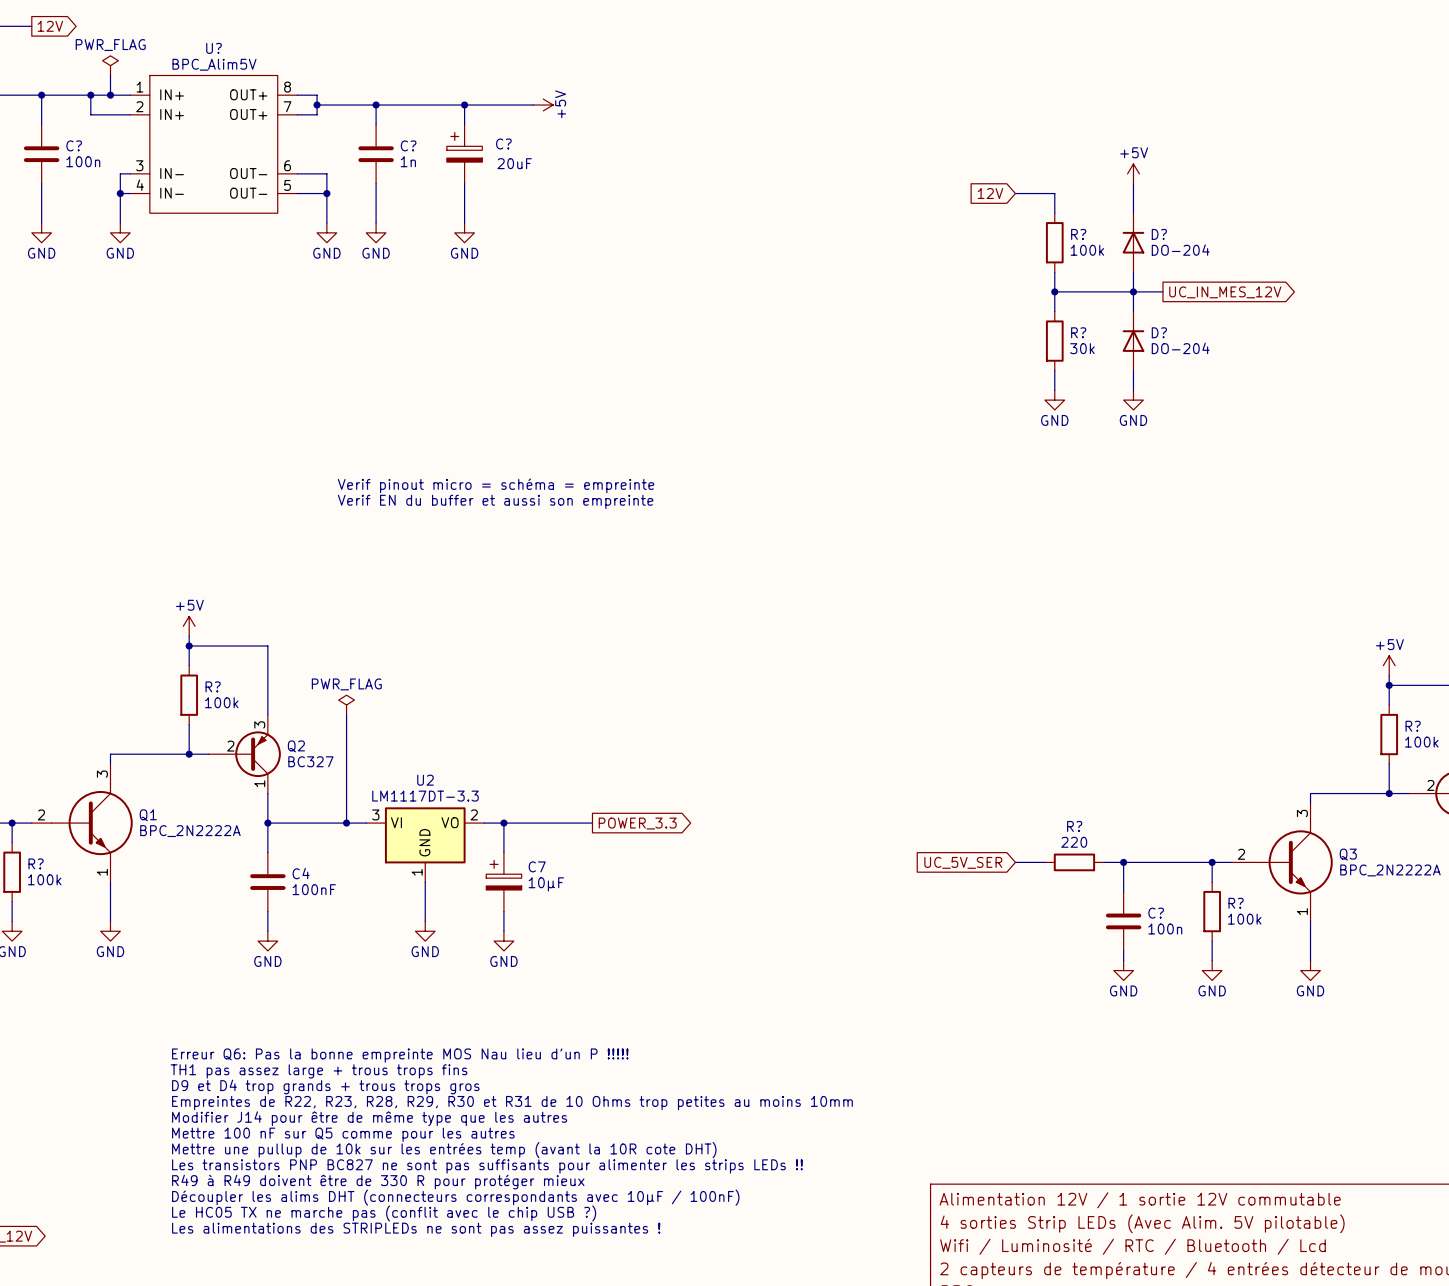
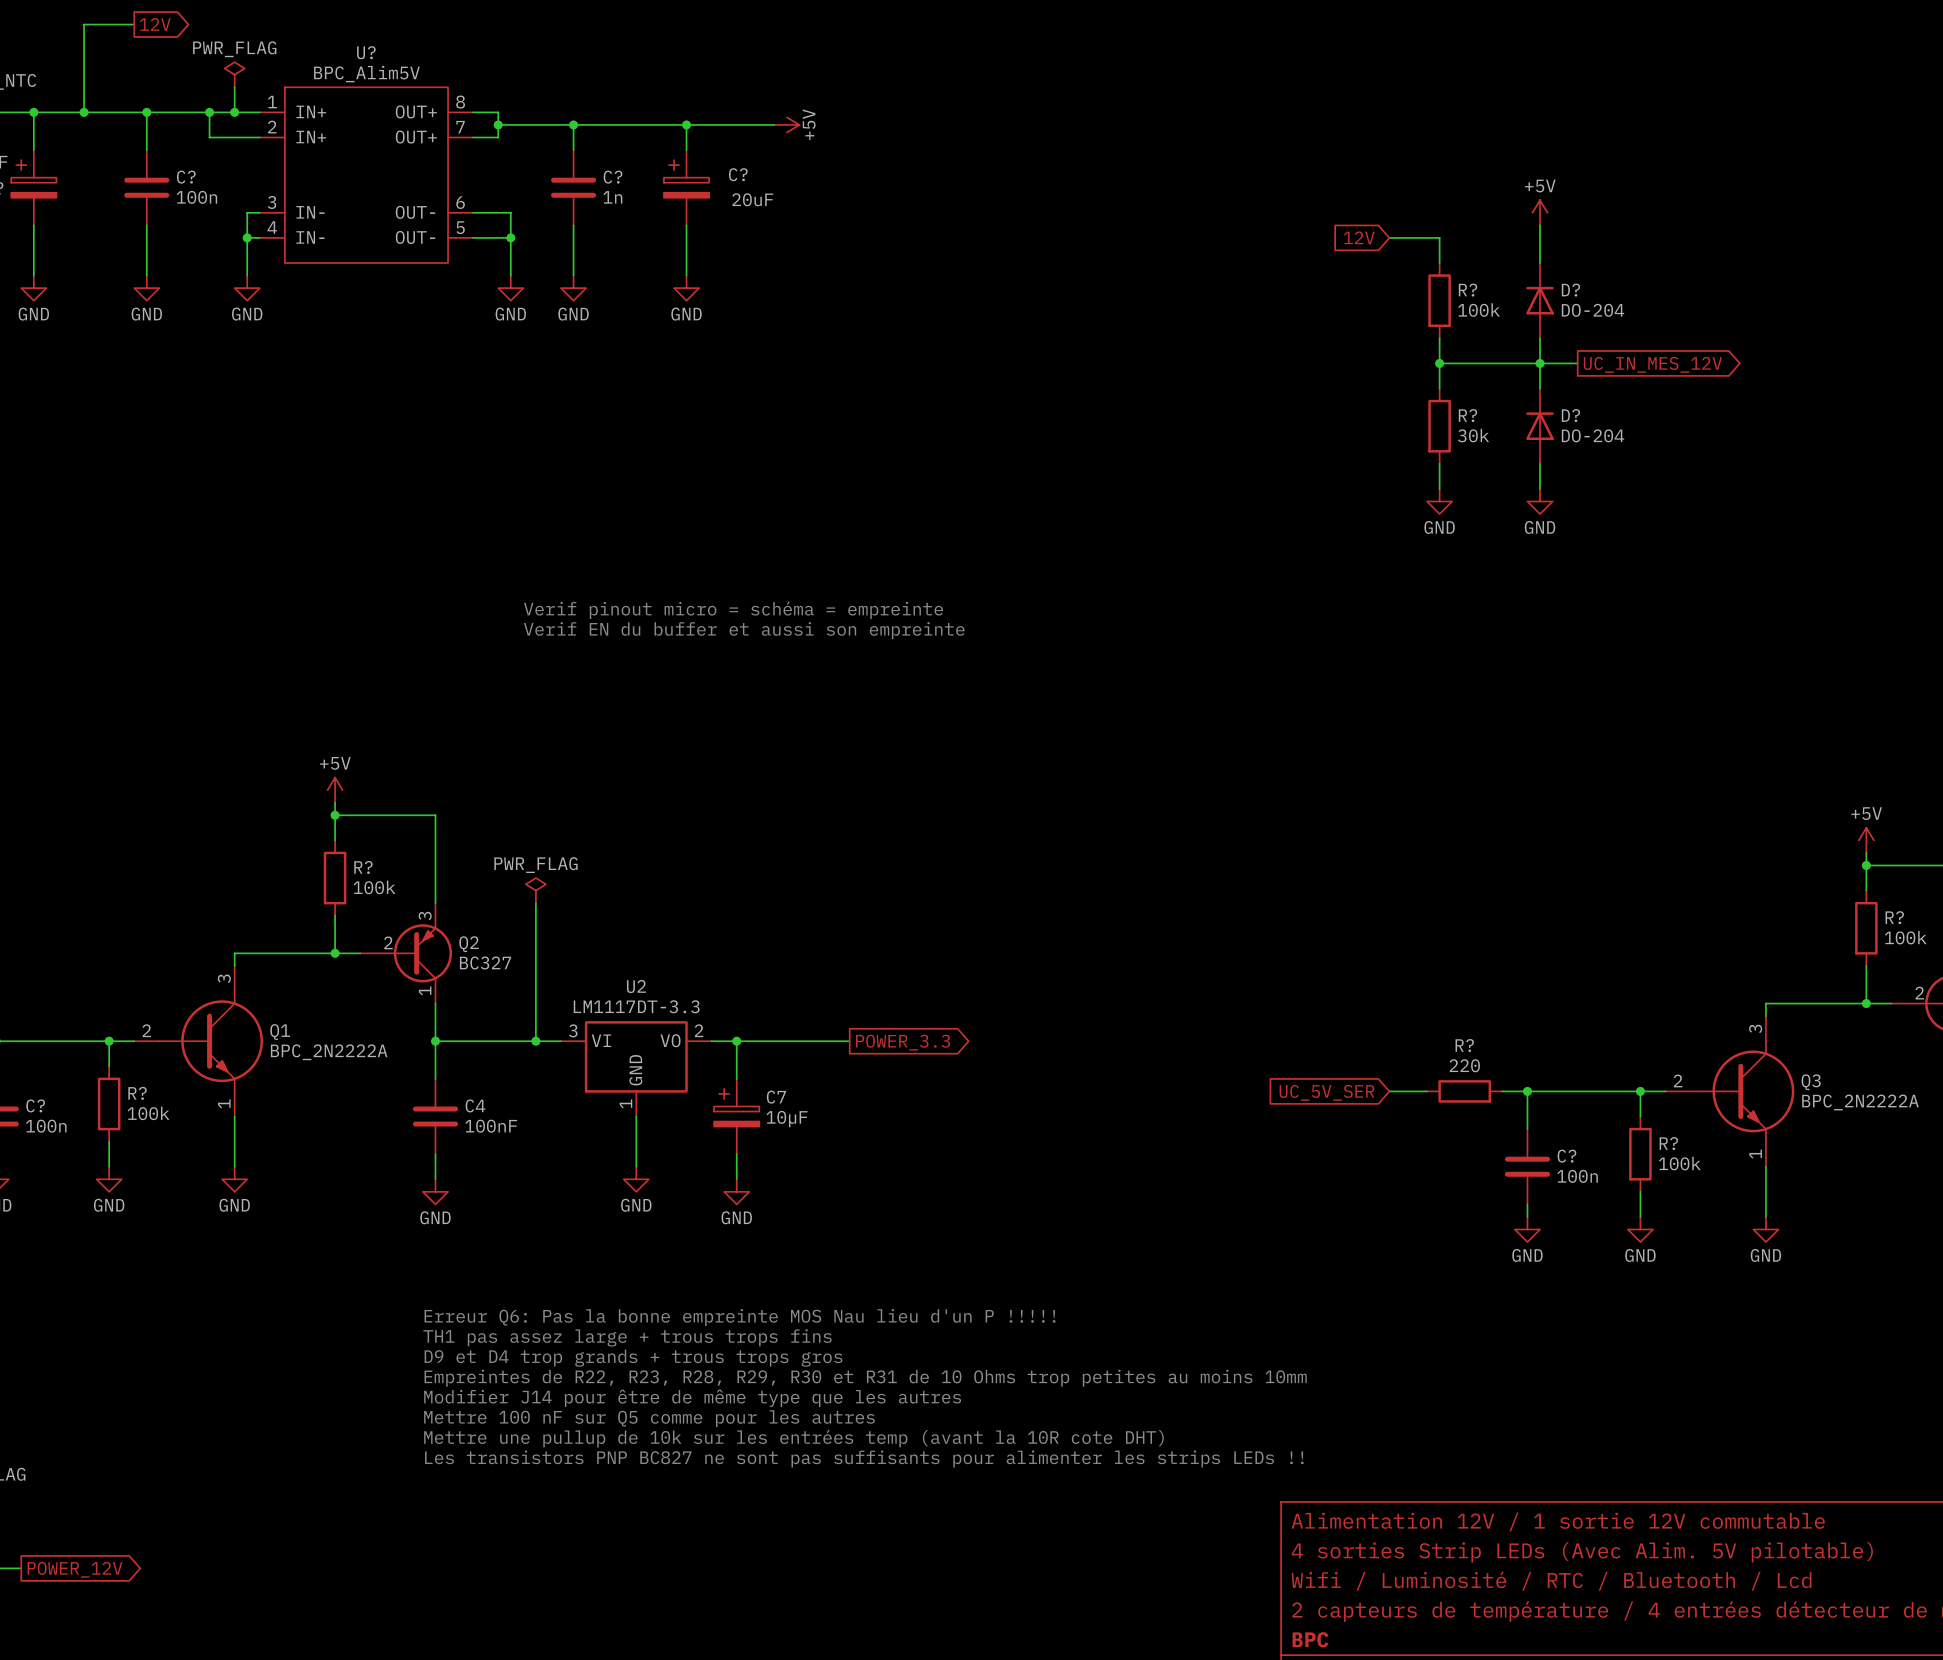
text position: Erreur Q6: Pas la bonne empreinte MOS Nau lieu d'un P !!!!! (400, 1055) -> Erreur Q6: Pas la bonne empreinte MOS Nau lieu d'un P !!!!! (740, 1317)
text position: TH1 pas assez large + trous trops fins (319, 1071) -> TH1 pas assez large + trous trops fins (627, 1337)
text position: D9 et D4 trop grands + trous trops gros (325, 1087) -> D9 et D4 trop grands + trous trops gros (633, 1358)
text position: Empreintes de R22, R23, R28, R29, R30 et R31 de 10 Ohms trop petites au moins 10mm (512, 1103) -> Empreintes de R22, R23, R28, R29, R30 et R31 de 10 Ohms trop petites au moins 10mm (865, 1378)
text position: Modifier J14 pour être de même type que les autres (369, 1118) -> Modifier J14 pour être de même type que les autres (692, 1398)
text position: Mettre 100 nF sur Q5 comme pour les autres (343, 1134) -> Mettre 100 nF sur Q5 comme pour les autres (649, 1418)
text position: Mettre une pullup de 10k sur les entrées temp (avant la 10R cote DHT) (444, 1150) -> Mettre une pullup de 10k sur les entrées temp (avant la 10R cote DHT) (793, 1438)
text position: Les transistors PNP BC827 ne sont pas suffisants pour alimenter les strips LEDs !! (487, 1166) -> Les transistors PNP BC827 ne sont pas suffisants pour alimenter les strips LEDs !! (864, 1459)
text: R49 à R49 doivent être de 330 R pour protéger mieux (378, 1182) -> none
text: Découpler les alims DHT (connecteurs correspondants avec 10µF / 100nF) (455, 1197) -> none
text: Le HC05 TX ne marche pas (conflit avec le chip USB ?) (384, 1213) -> none
text: Les alimentations des STRIPLEDs ne sont pas assez puissantes ! (416, 1229) -> none

